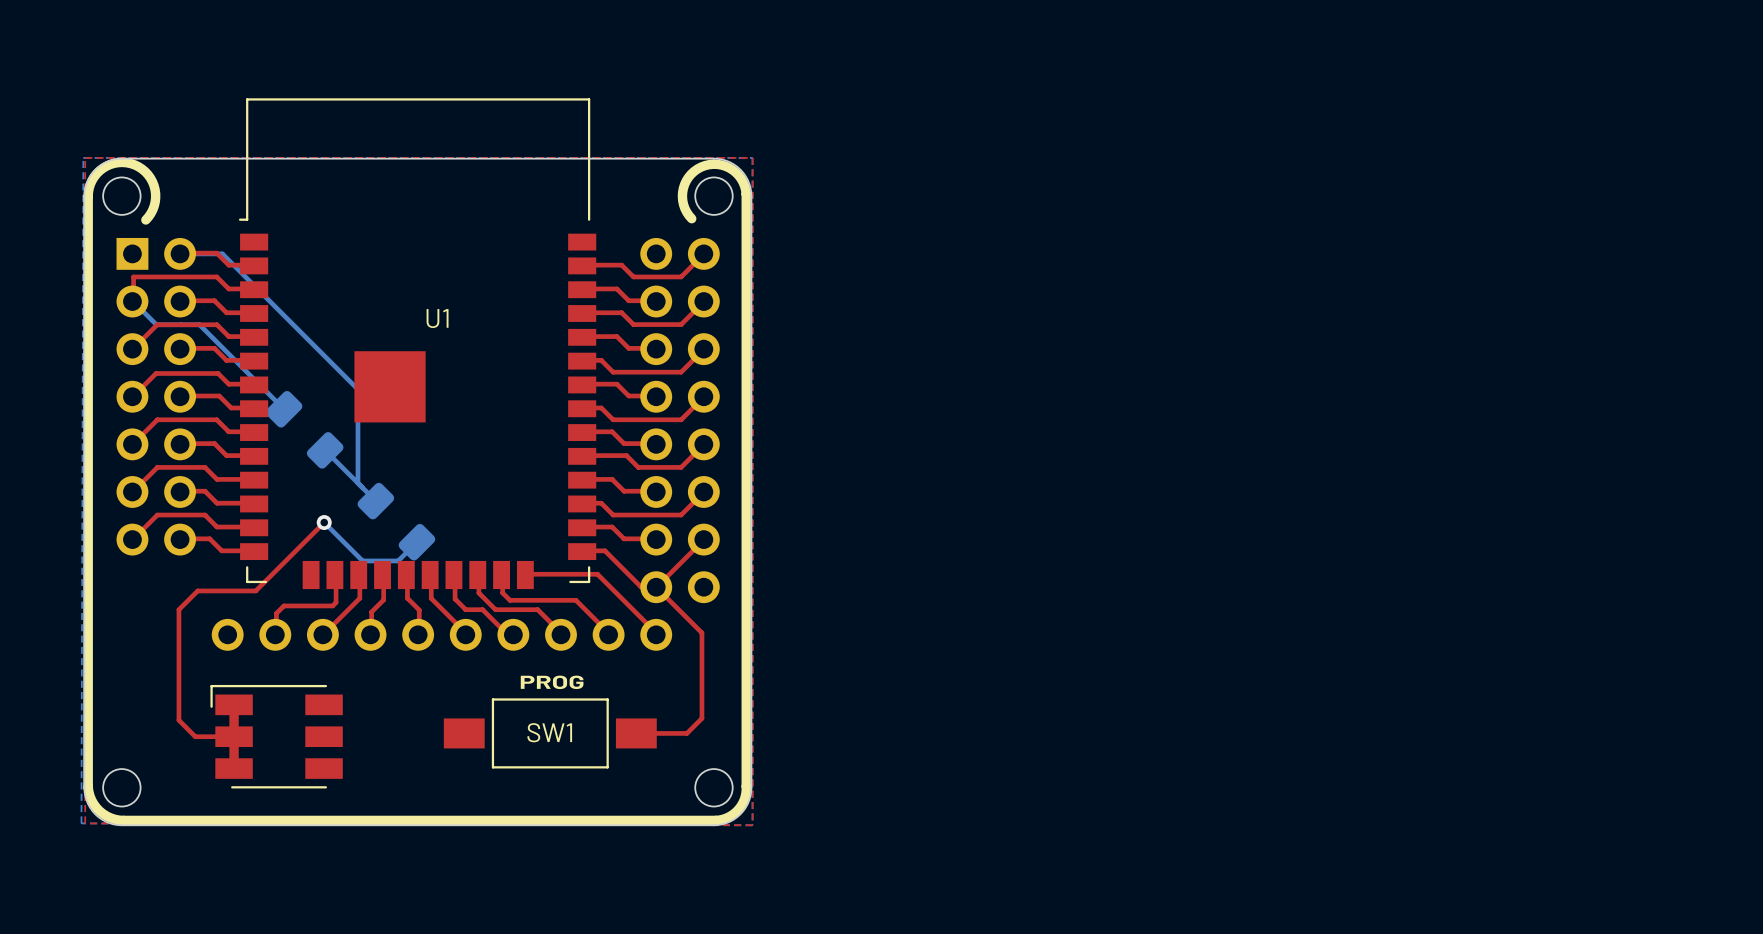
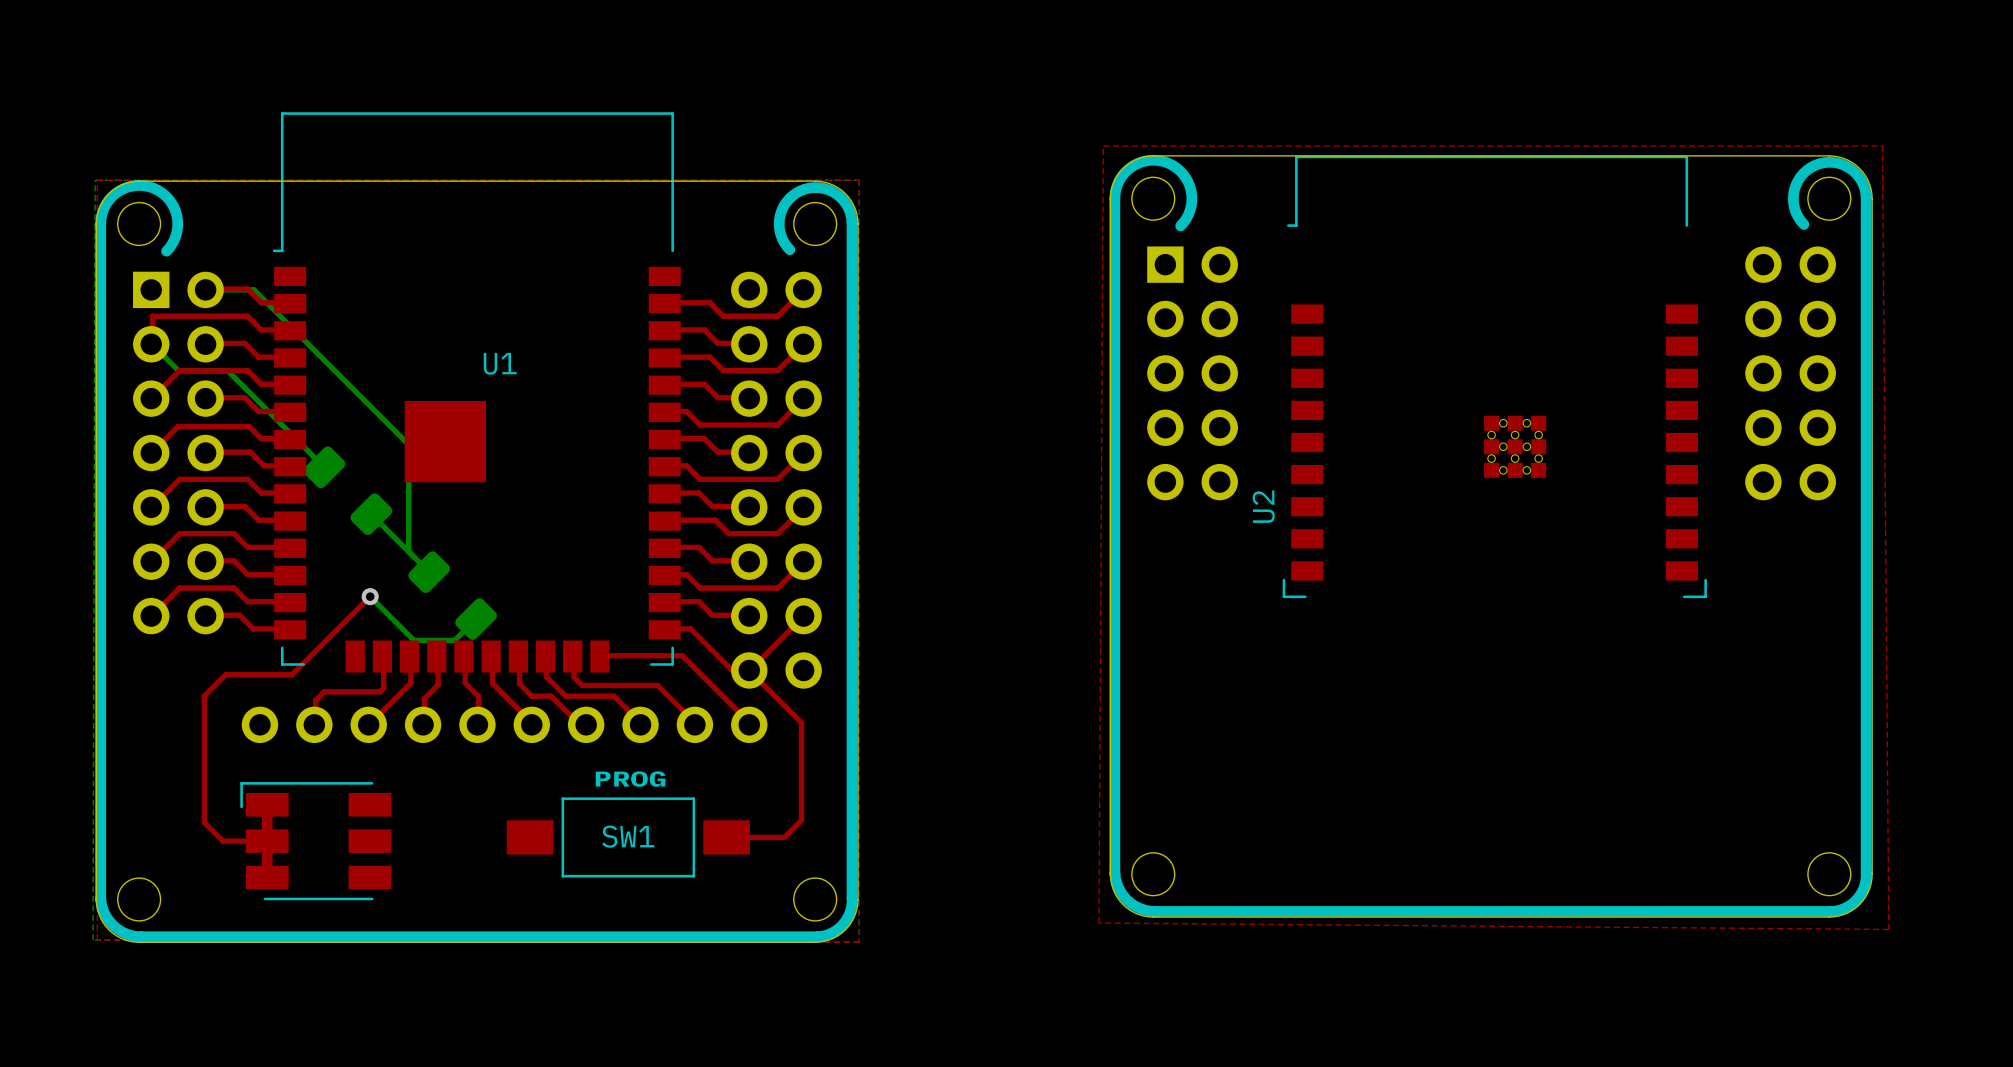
top zone outline: none -> (1103, 146) (1882, 146) (1888, 929) (1099, 923) (1103, 146)
U2: none -> (1491, 536)

